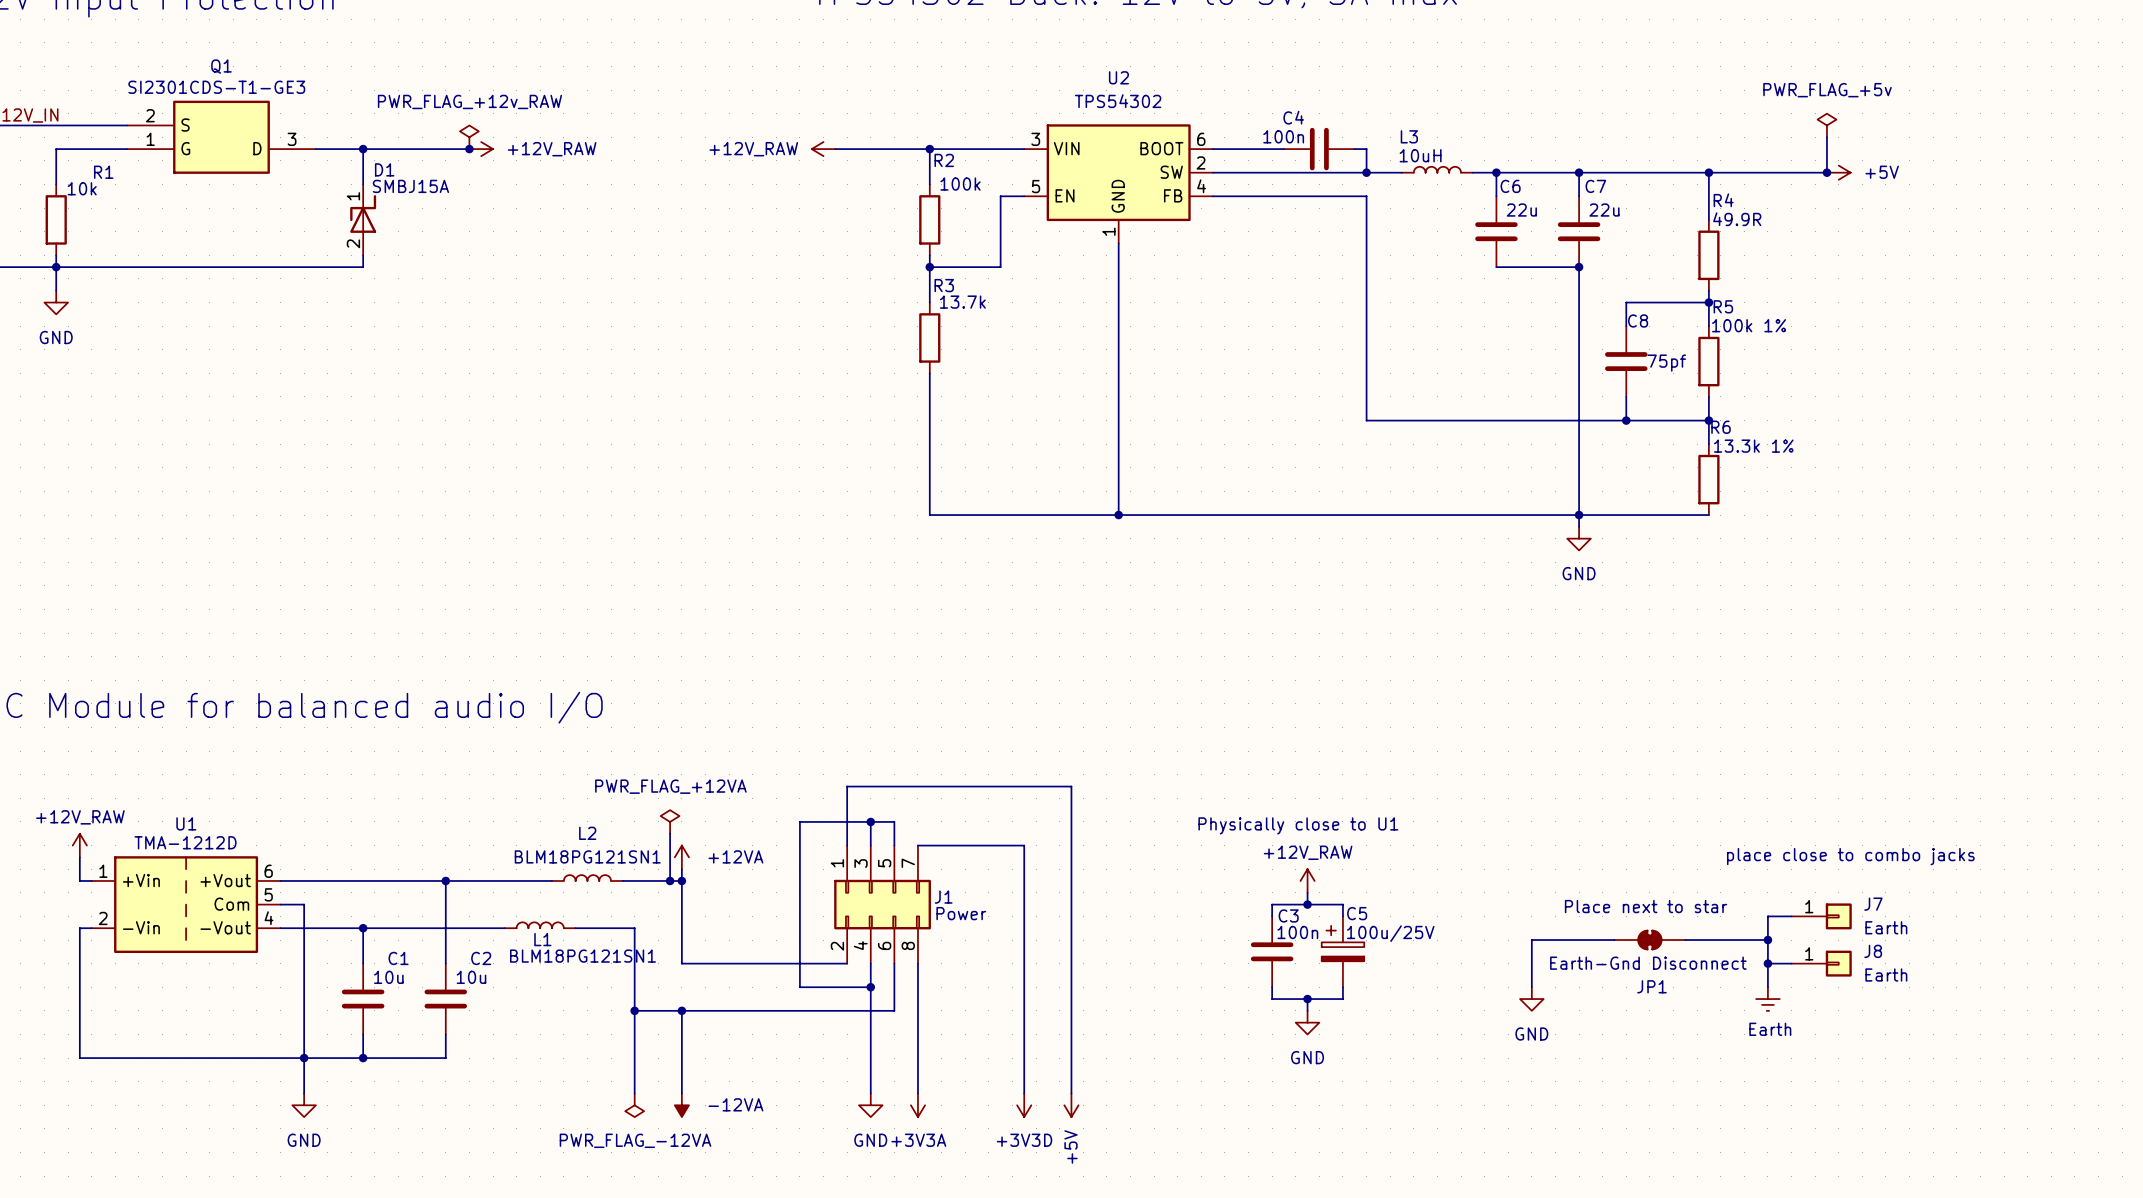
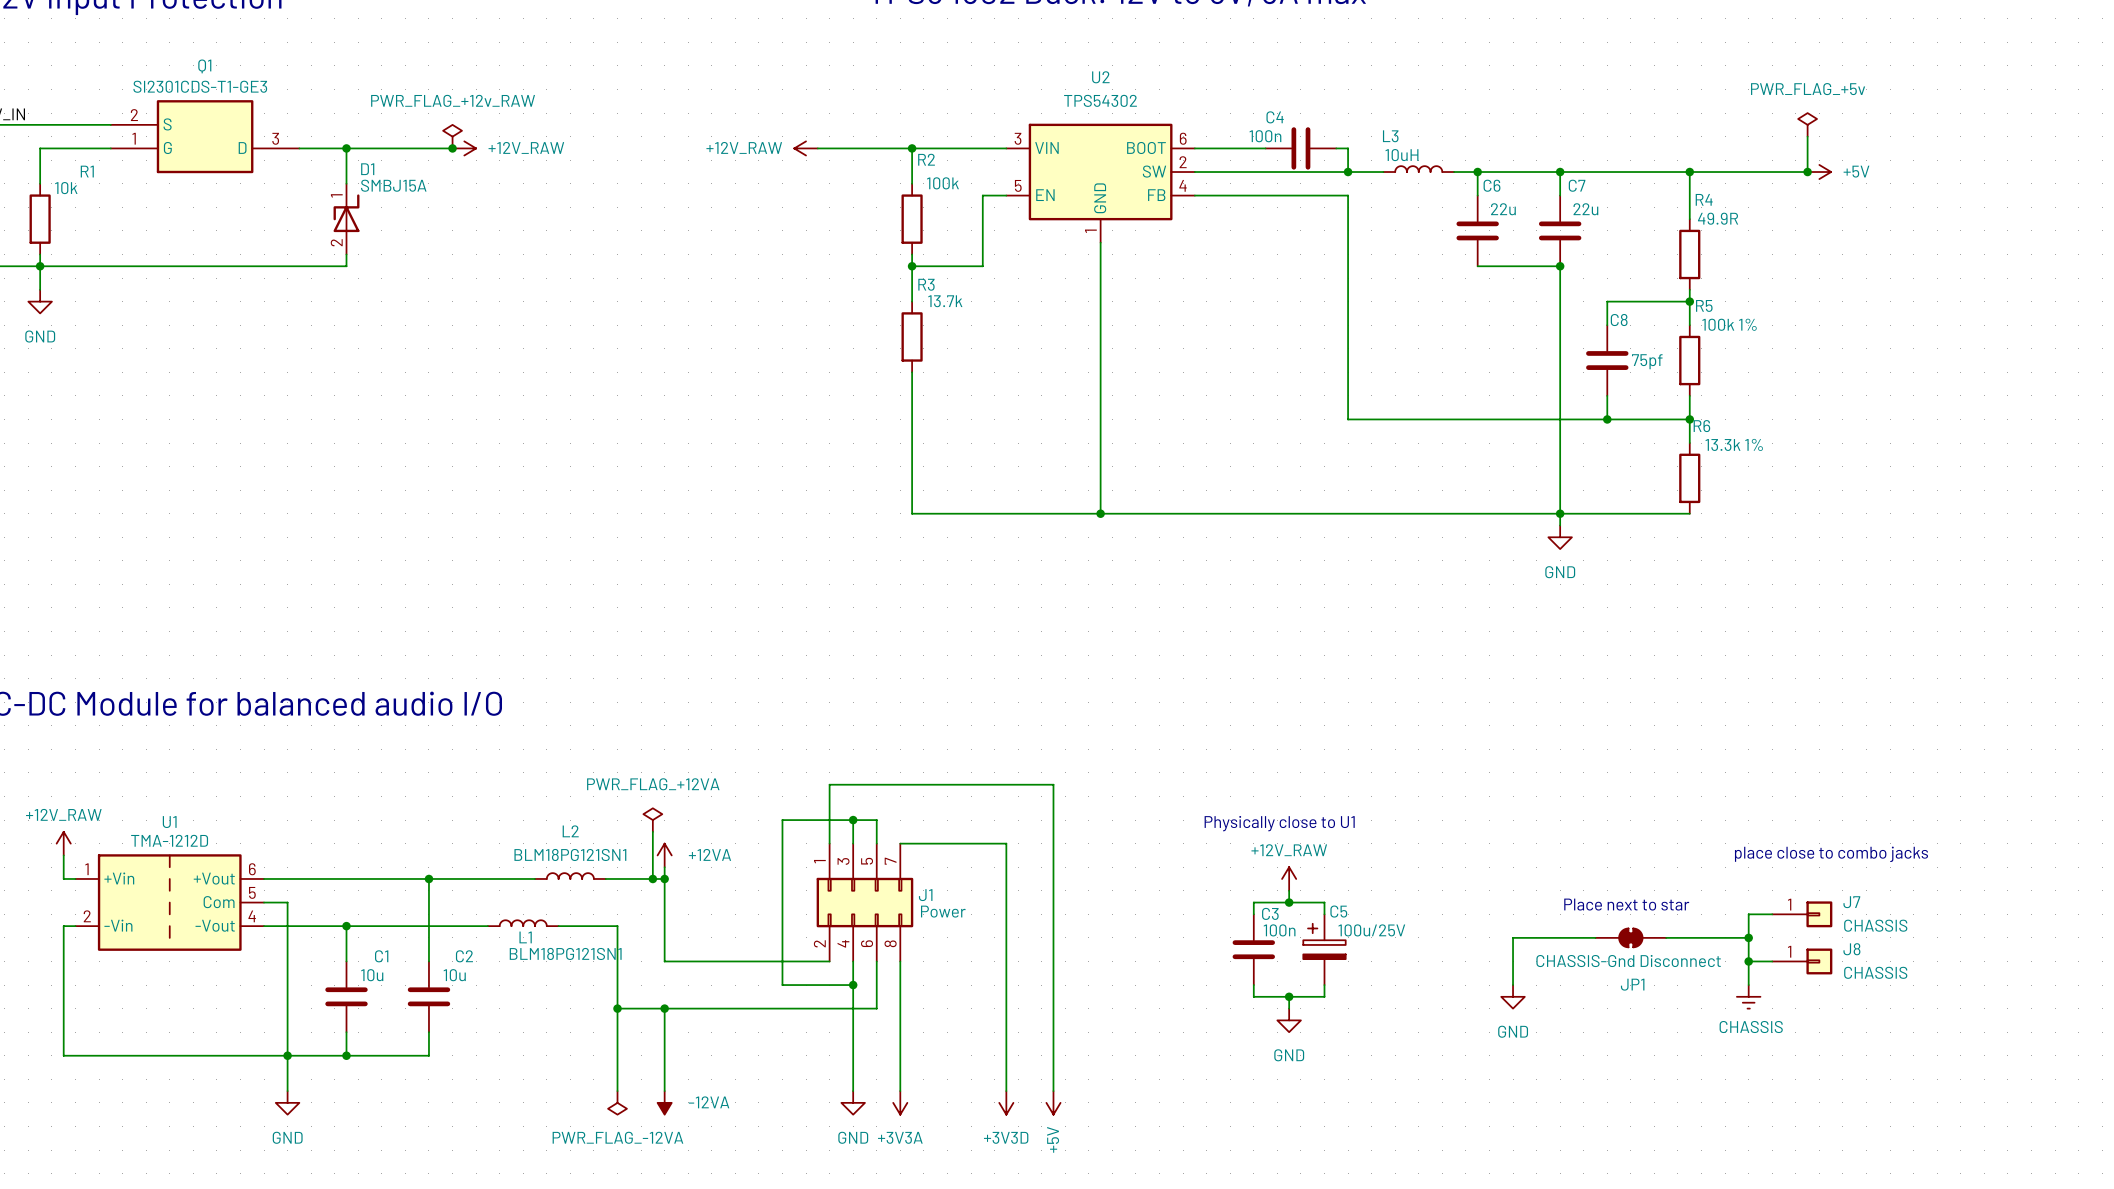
J7 value: Earth (1886, 927) -> CHASSIS (1875, 925)
JP1 value: Earth-Gnd Disconnect (1648, 963) -> CHASSIS-Gnd Disconnect (1628, 961)
J8 value: Earth (1886, 974) -> CHASSIS (1875, 972)
power symbol: Earth (1767, 999) -> CHASSIS (1748, 996)

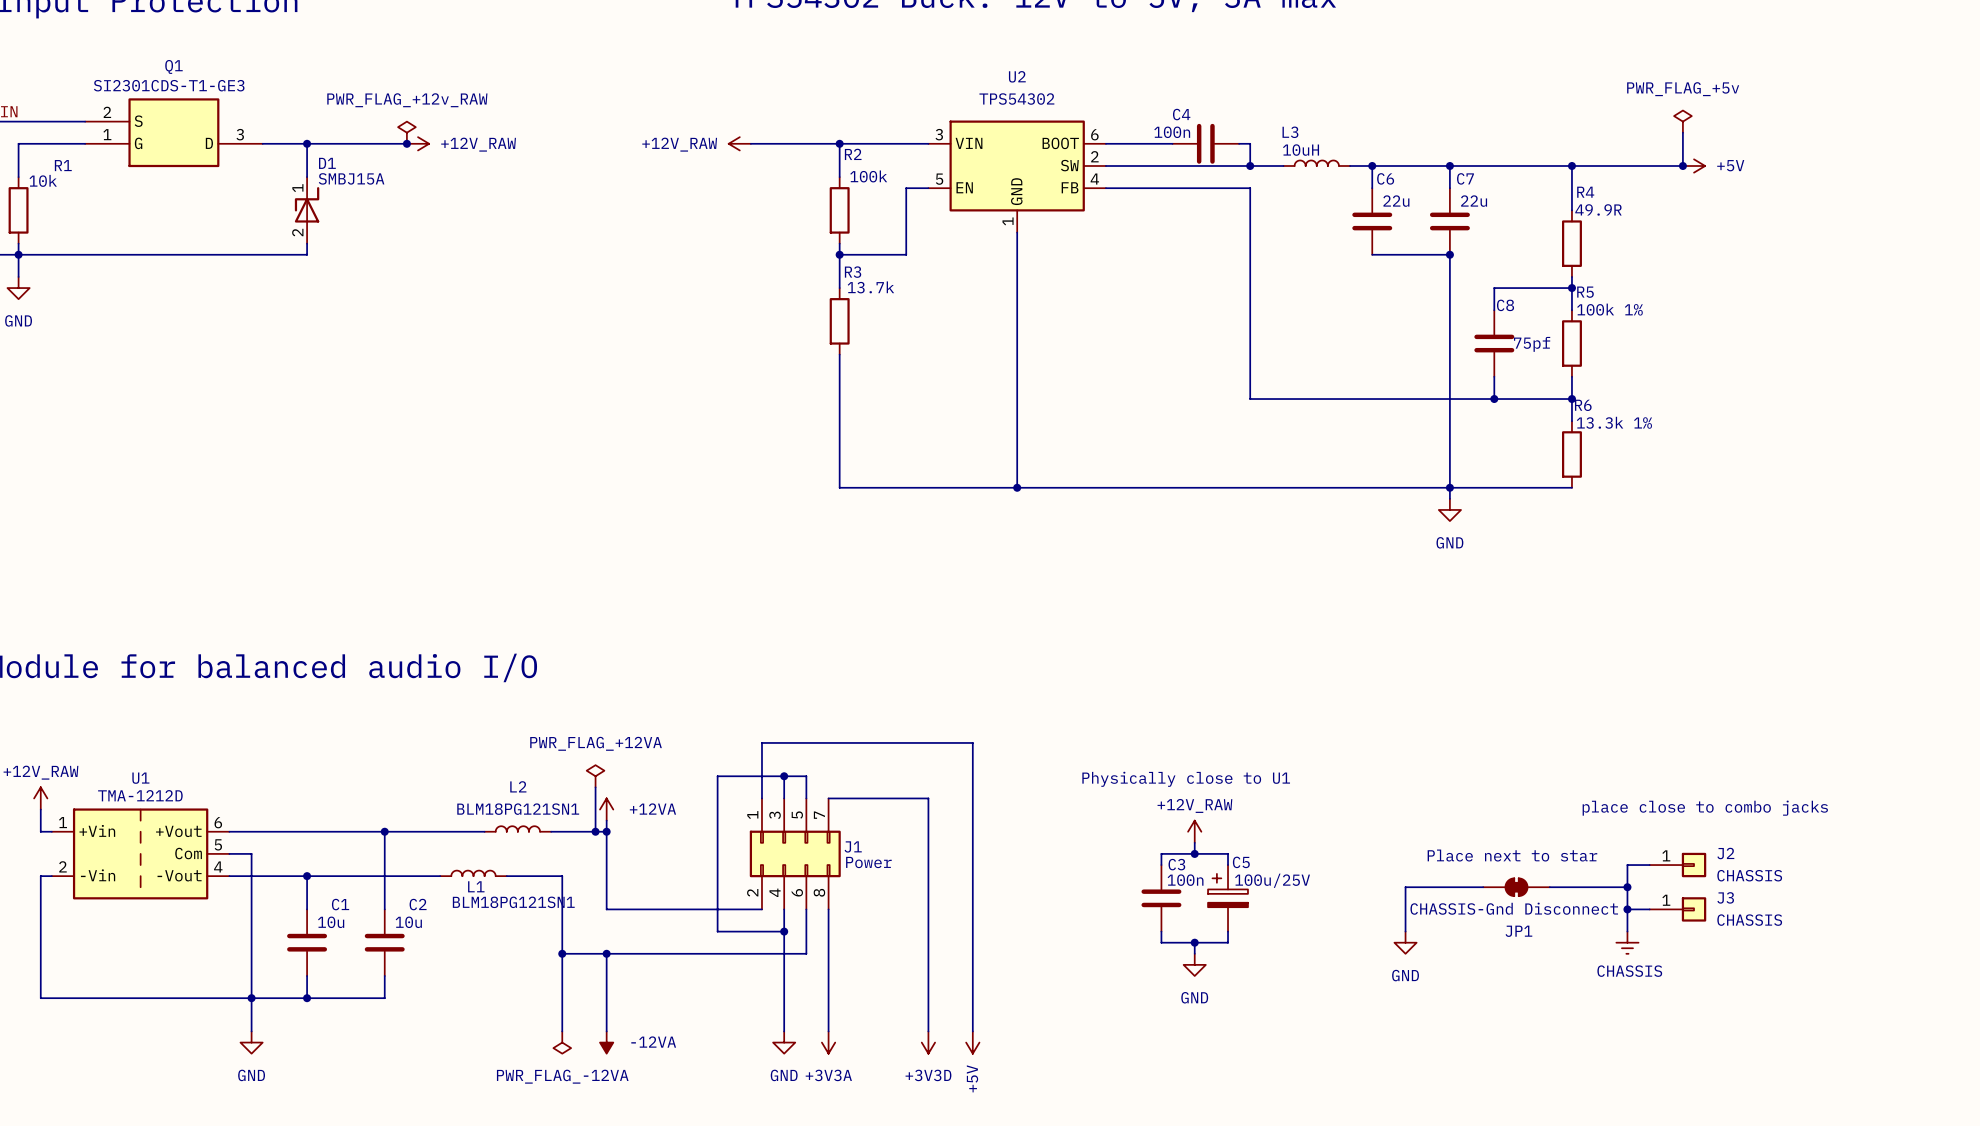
J7 name: J7 (1851, 902) -> J2 (1725, 853)
J8 name: J8 (1851, 949) -> J3 (1725, 897)

